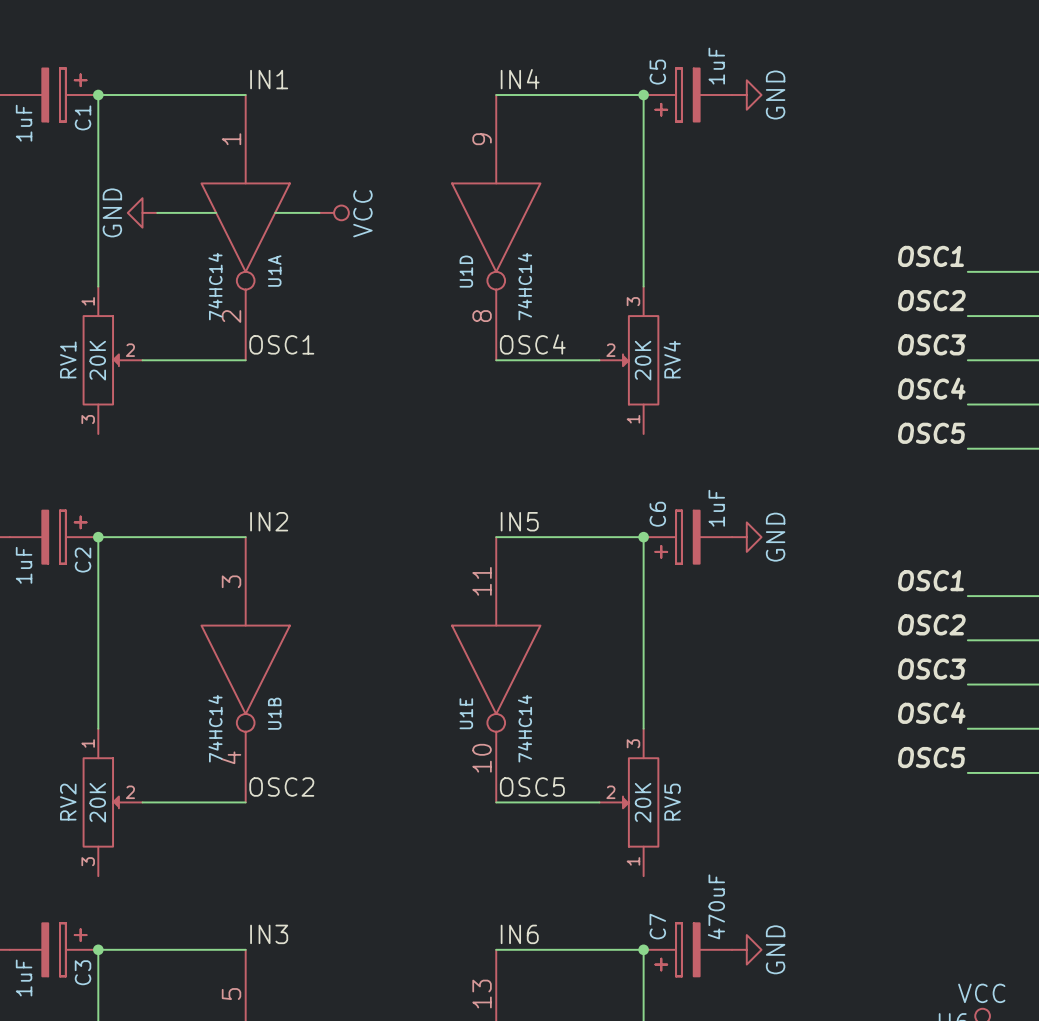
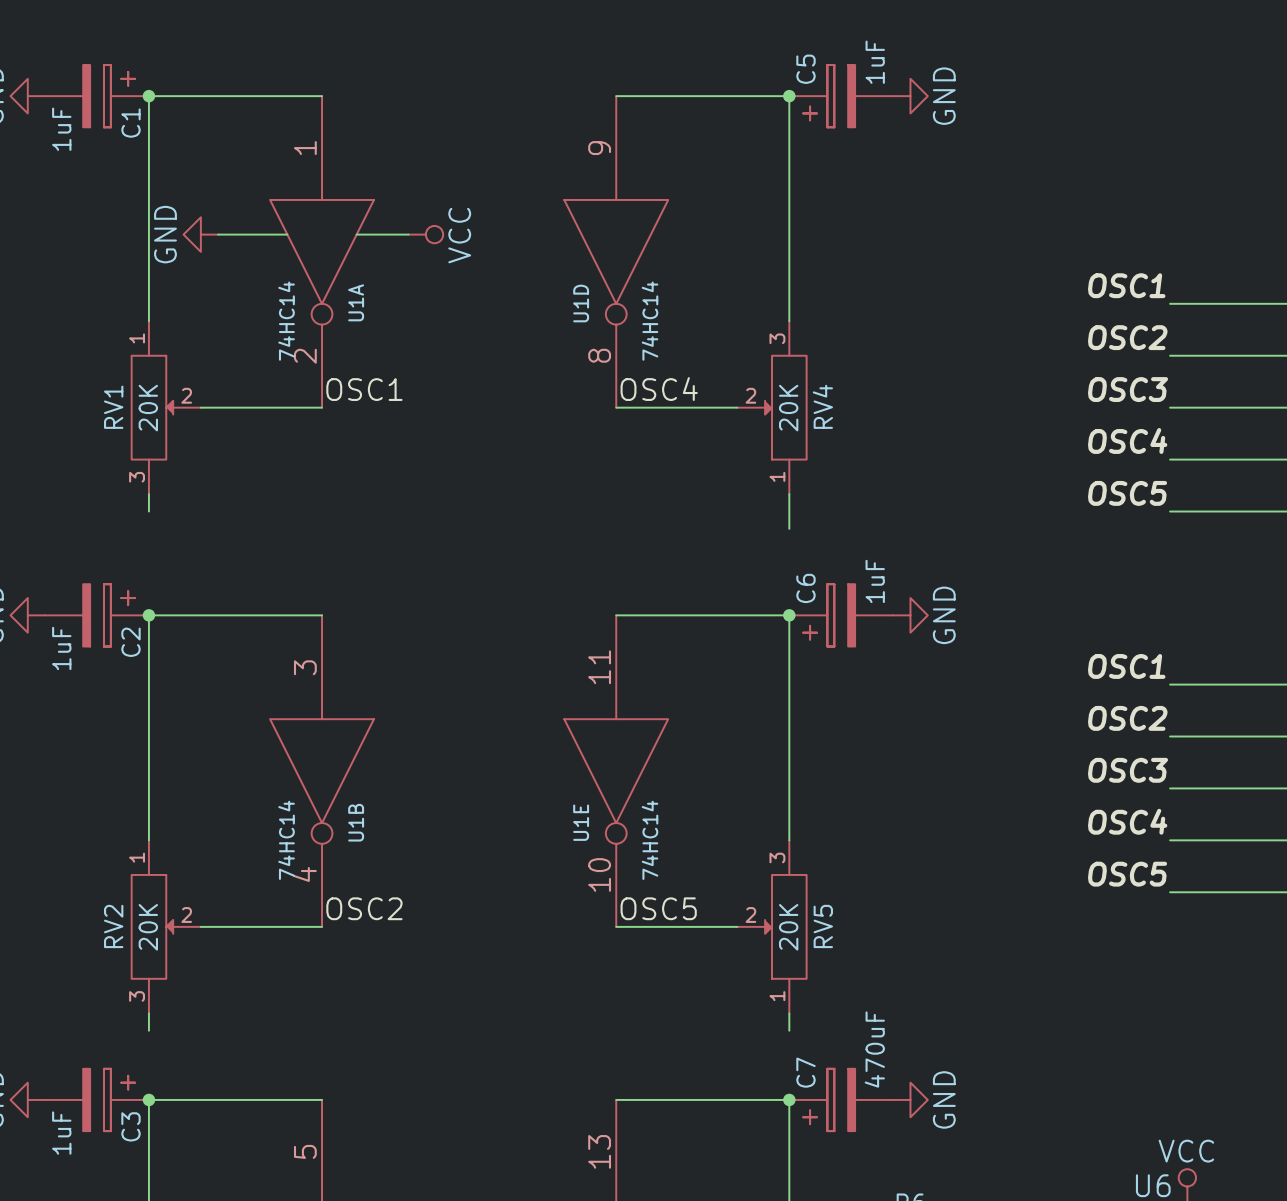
label: IN1 (269, 79) -> none
label: IN4 (520, 79) -> none
wire: none -> (148, 494) (148, 511)
wire: none -> (789, 494) (789, 528)
label: IN2 (269, 521) -> none
label: IN5 (519, 521) -> none
wire: none -> (148, 1013) (148, 1030)
wire: none -> (789, 1013) (789, 1030)
label: IN3 (269, 934) -> none
label: IN6 (519, 934) -> none

